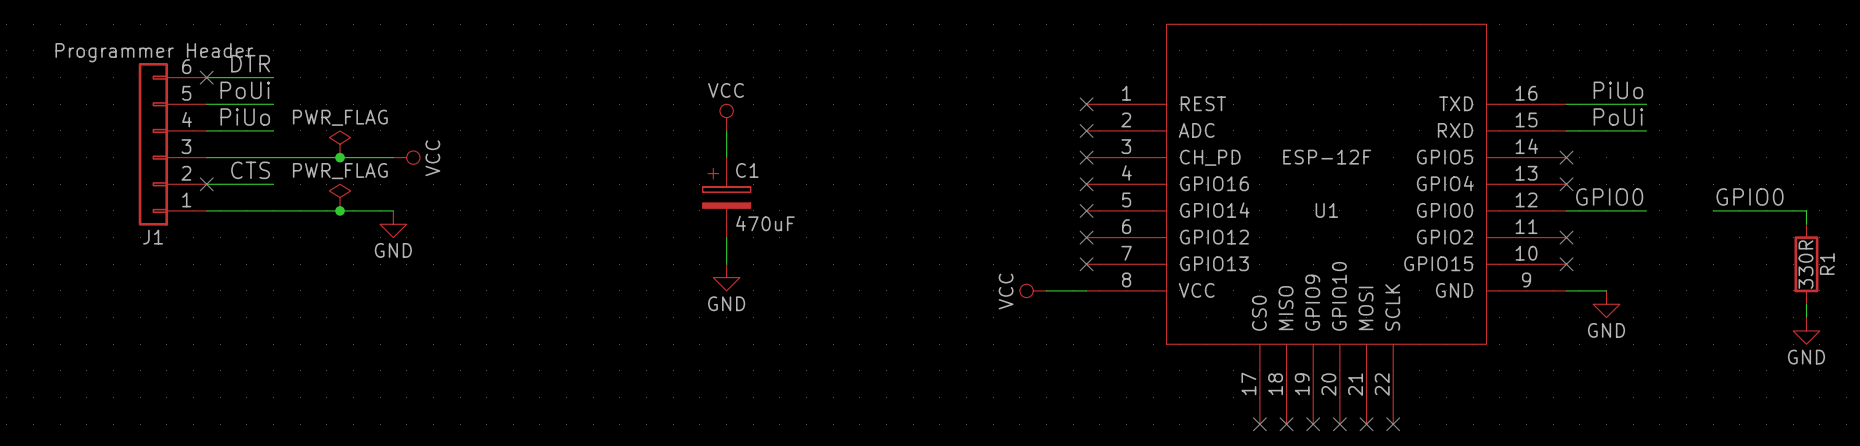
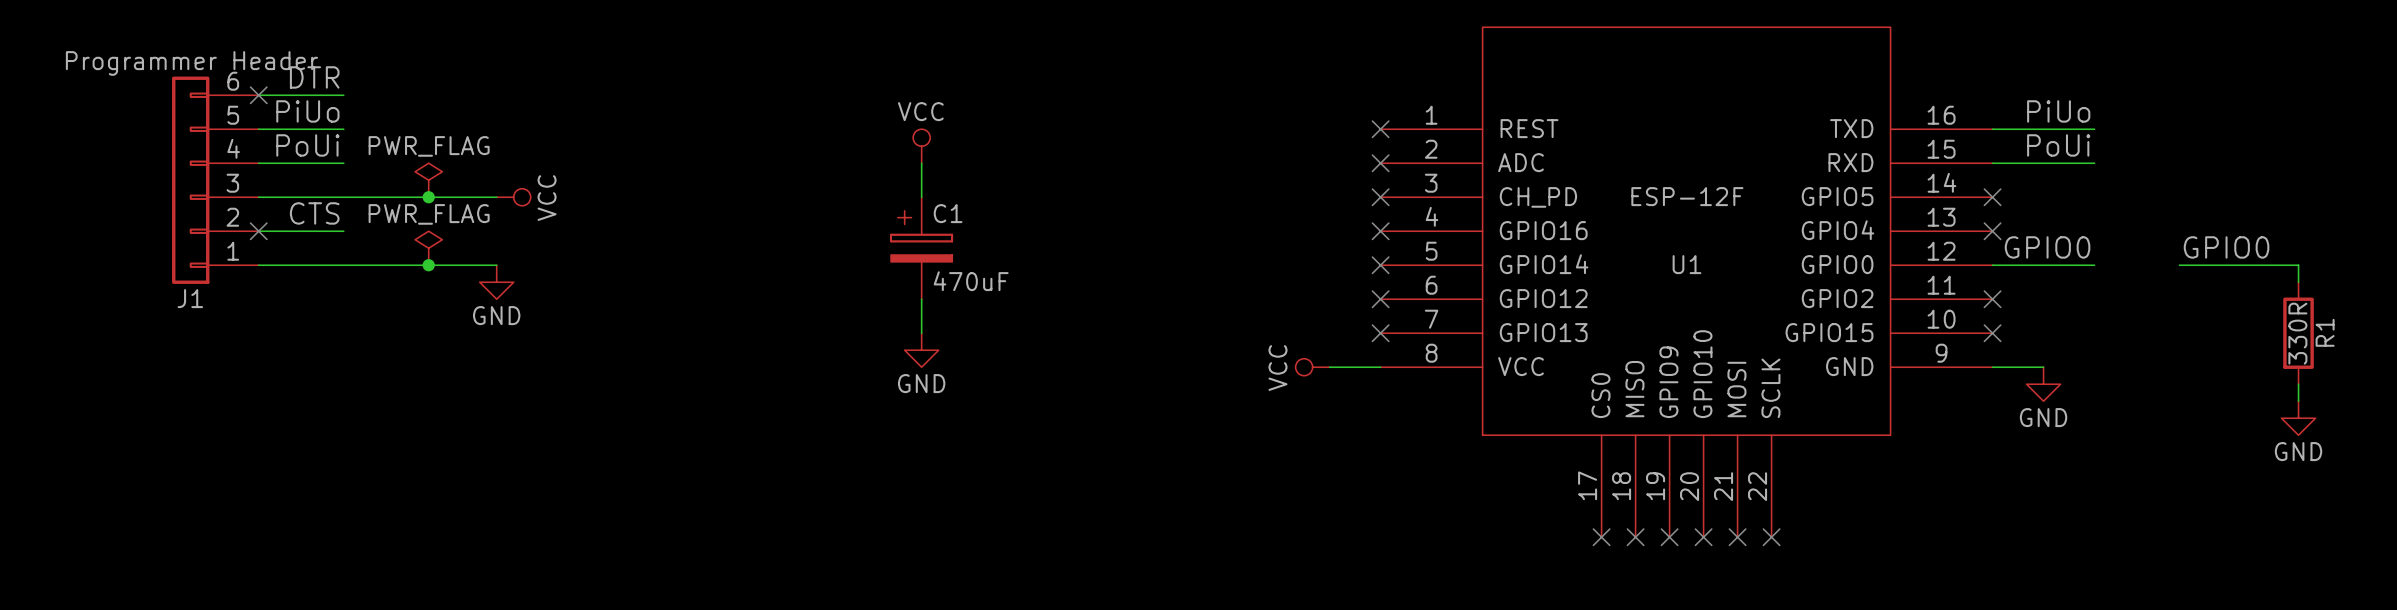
label: PoUi (245, 90) -> PiUo (307, 111)
label: PiUo (245, 117) -> PoUi (307, 145)

